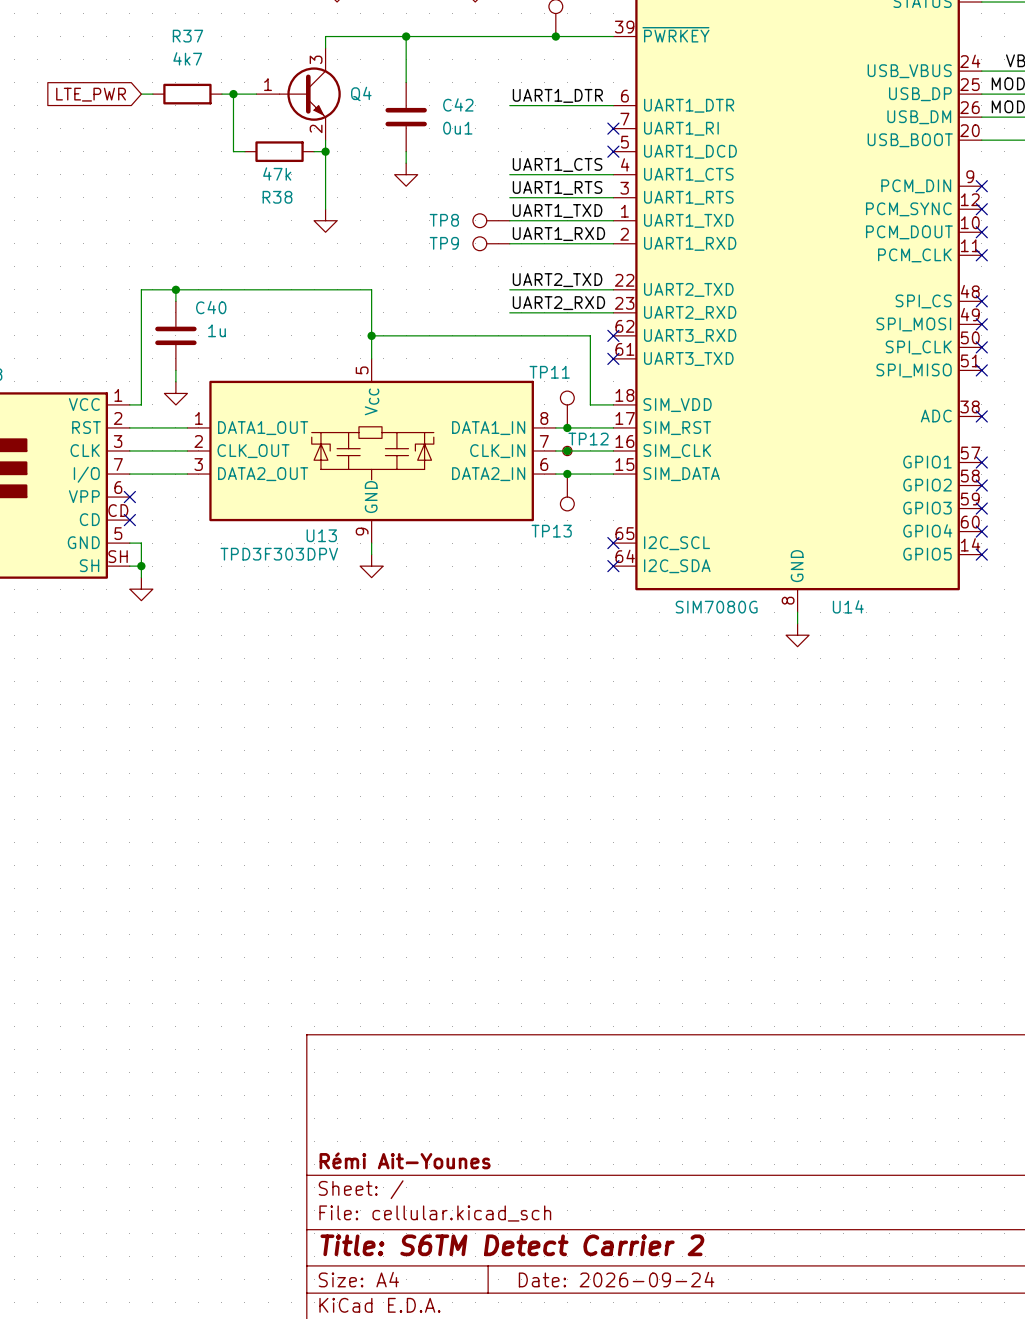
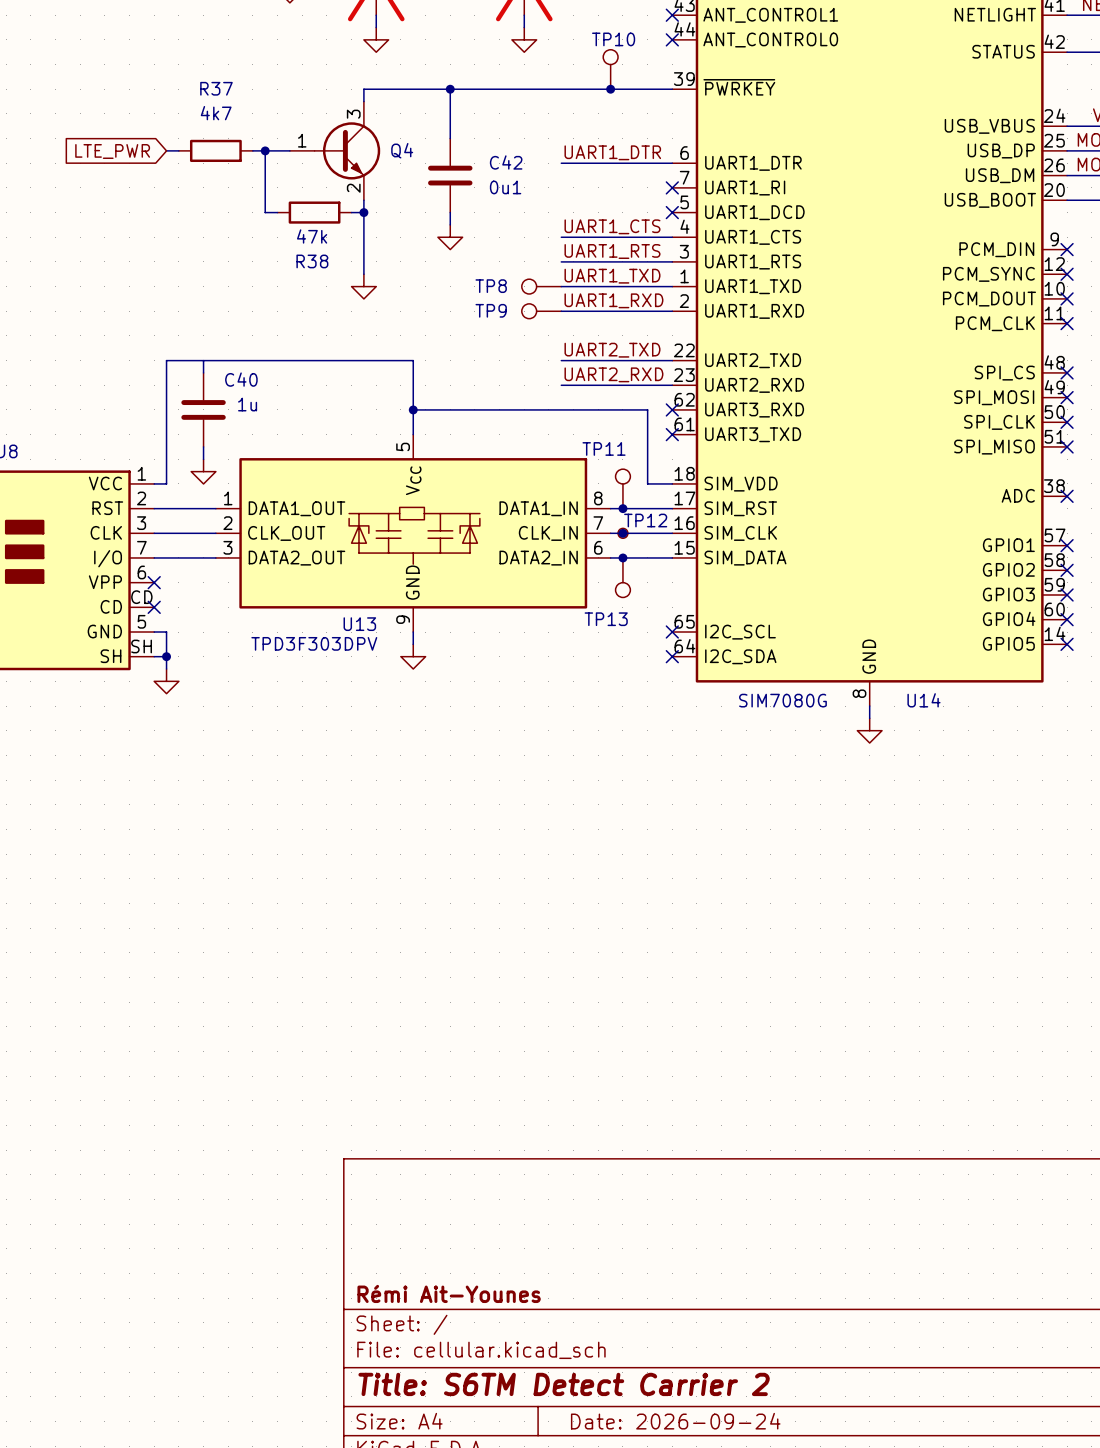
junction: (175, 289) -> none

